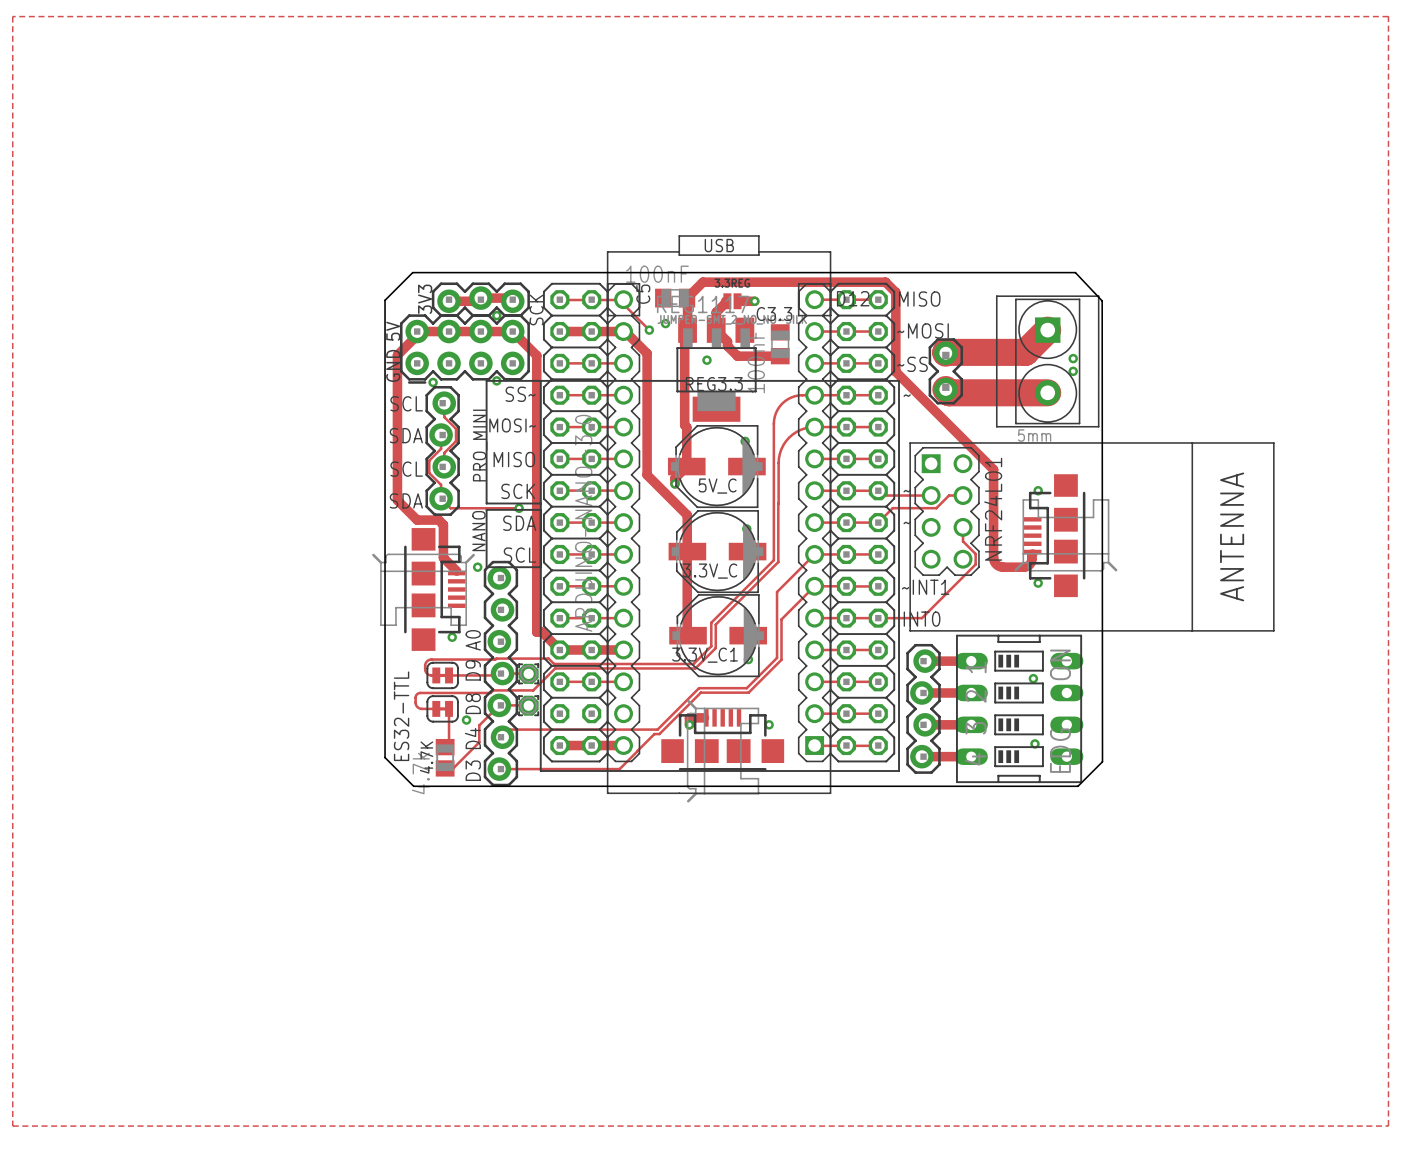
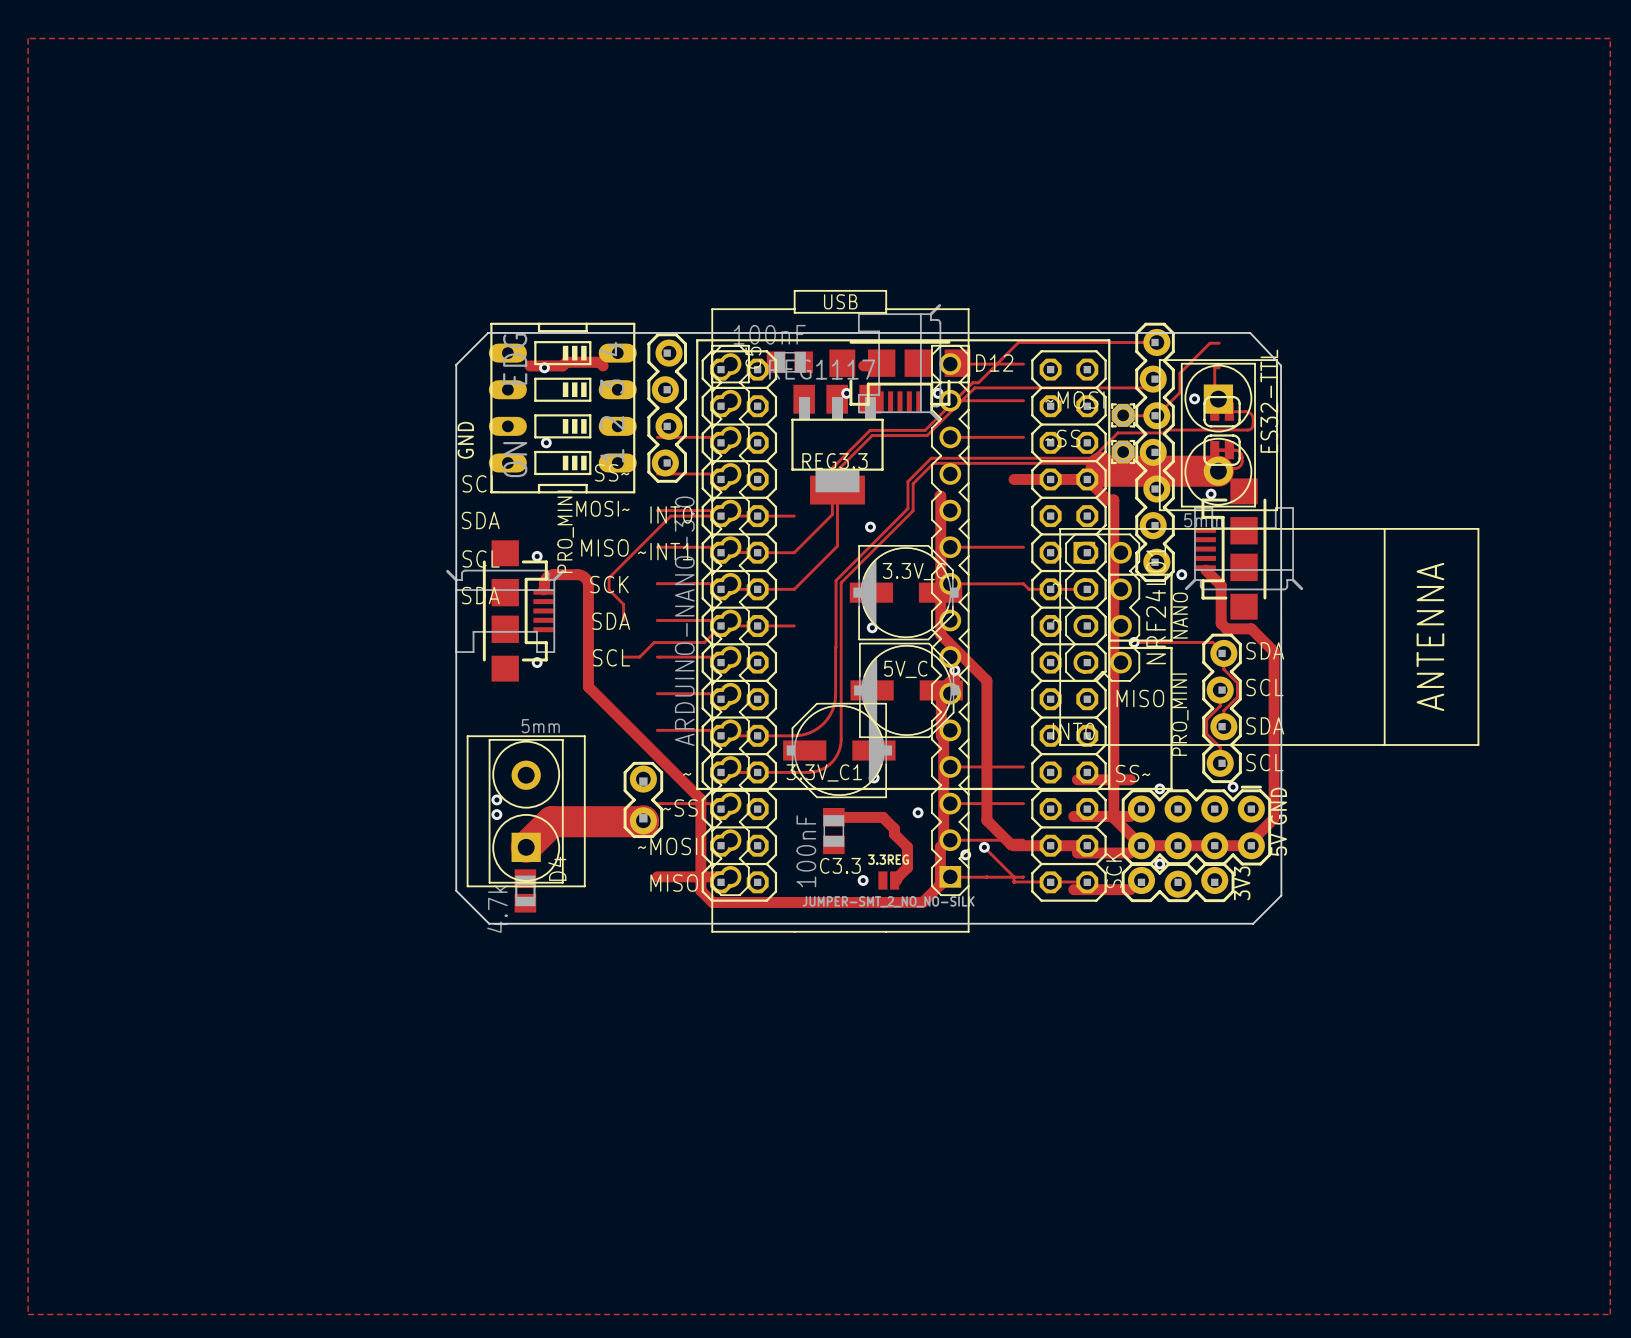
track: none -> (1156, 342) (1018, 342) (998, 362)
track: none -> (1219, 343) (1209, 343) (1179, 373) (1179, 392) (1156, 415) (1123, 415)
part: none -> (899, 363)
track: none -> (998, 363) (978, 382) (972, 382) (925, 430) (870, 430) (832, 468) (832, 514) (794, 552) (721, 552)
3V3 rotation: 0° (480, 299) -> 180° (1178, 882)
3V3 position: (480, 299) -> (1178, 882)
track: (559, 299) (623, 299) (623, 304) (649, 330) -> none
text: MISO (919, 299) -> none
track: (725, 301) (716, 312) (716, 330) (727, 341) (727, 346) (737, 356) (780, 356) -> none
3.3REG position: (732, 301) -> (888, 880)
via: (754, 301) -> none
via: none -> (544, 367)
track: none -> (1219, 367) (1214, 367) (1214, 411)
text: SCK (536, 309) -> none
track: none -> (1153, 379) (1144, 387) (974, 387) (927, 435) (872, 435) (837, 470) (837, 546) (794, 589) (721, 589)
C3.3 name position: C3.3 (774, 314) -> C3.3 (840, 865)
via: (496, 315) -> none
via: (665, 323) -> none
via: none -> (846, 393)
via: none -> (938, 393)
via: none -> (1194, 398)
via: (649, 330) -> none
track: (1047, 330) (1025, 352) (945, 353) -> none
text: 5V (393, 331) -> none
track: (559, 331) (623, 331) (647, 353) (647, 474) (687, 515) (688, 635) -> none
part: none -> (562, 408)
part: none -> (1222, 411)
track: none -> (1229, 411) (1250, 413) (1253, 418) (1252, 427) (1247, 430) (1166, 430) (1164, 432) (1117, 432) (1092, 458) (931, 458) (907, 481) (907, 508) (836, 580) (835, 694) (834, 705) (827, 719) (814, 730) (799, 735) (721, 735)
C3.3 position: (780, 344) -> (833, 831)
part: none -> (1123, 415)
part: (464, 349) -> none
via: (1073, 358) -> none
via: (706, 360) -> none
via: none -> (546, 442)
part: (945, 371) -> none
via: (1073, 371) -> none
part: none -> (1222, 450)
track: none -> (1229, 450) (1236, 450) (1241, 453) (1242, 462) (1238, 467) (1100, 469) (1093, 463) (933, 463) (913, 483) (913, 510) (841, 582) (841, 739) (840, 748) (834, 759) (824, 768) (812, 772) (721, 772)
part: none -> (1123, 452)
via: (496, 380) -> none
line: (540, 380) (540, 770) (899, 770) (899, 380) (486, 380) (486, 503) (540, 503) -> none
via: (433, 382) -> none
track: (878, 395) (798, 395) (788, 399) (779, 406) (773, 423) (773, 560) (711, 622) (711, 646) (693, 663) (554, 663) (548, 658) (428, 660) (425, 665) (426, 672) (429, 675) (436, 675) -> none
text: ~ (907, 395) -> none
track: none -> (1014, 479) (1087, 479) (1107, 499) (1113, 499) (1113, 818) (1141, 845) (1251, 845) (1251, 841) (1274, 818) (1274, 651) (1251, 628) (1226, 628) (1221, 623) (1221, 585) (1205, 570)
track: (444, 403) (444, 417) (456, 428) (456, 441) (444, 453) (444, 466) -> none
via: none -> (1211, 494)
track: none -> (939, 495) (940, 634) (986, 680) (986, 820) (1014, 845) (1087, 845)
track: (878, 427) (809, 427) (796, 431) (786, 441) (781, 449) (778, 463) (778, 562) (715, 624) (715, 648) (695, 668) (555, 668) (533, 690) (493, 690) (490, 692) (420, 692) (416, 694) (415, 703) (418, 707) (436, 708) -> none
text: none -> INT0 (671, 515)
track: none -> (794, 516) (670, 516) (609, 577) (609, 589) (623, 604) (623, 620)
track: (441, 435) (441, 448) (429, 460) (429, 473) (441, 484) (441, 498) (450, 508) (519, 508) -> none
part position: (442, 450) -> (667, 408)
text: none -> ~INT1 (665, 551)
via: none -> (537, 556)
5V_C rotation: 0° (716, 466) -> 180° (906, 690)
5V_C position: (716, 466) -> (906, 690)
line: none -> (1109, 574) (1171, 574) (1171, 640) (1109, 640)
track: (674, 483) (674, 478) (686, 466) (684, 333) (687, 330) (687, 298) (702, 282) (885, 282) (895, 292) (895, 371) (993, 469) (994, 562) (1001, 567) (1025, 566) (1030, 563) (1032, 553) -> none
via: (674, 483) -> none
via position: (1038, 490) -> (1181, 574)
track: (963, 495) (949, 495) (936, 508) (892, 508) (878, 522) (814, 522) -> none
track: none -> (543, 589) (545, 579) (551, 575) (578, 574) (586, 580) (588, 686) (700, 799) (700, 890) (712, 902) (922, 902) (941, 884) (940, 847) (943, 843) (943, 738) (941, 735) (941, 690) (954, 676) (954, 670)
via: (519, 508) -> none
line: (540, 509) (486, 509) (486, 567) (540, 567) -> none
text: none -> NANO (1180, 615)
part position: (575, 522) -> (739, 625)
part position: (862, 522) -> (1068, 625)
track: none -> (794, 625) (721, 625) (704, 642) (654, 642) (639, 657) (623, 657)
track: (963, 527) (963, 541) (975, 553) (975, 564) (921, 618) (814, 618) -> none
text: NANO (478, 531) -> none
part position: (1065, 535) -> (1244, 549)
track: none -> (1134, 642) (1212, 642) (1223, 653) (1223, 669) (1237, 682) (1237, 697) (1223, 710) (1223, 726)
via: none -> (1134, 642)
line: none -> (1109, 647) (1171, 647) (1171, 788) (697, 788) (697, 340) (1109, 340) (1109, 788)
text: none -> SDA (1265, 650)
3.3V_C rotation: 0° (717, 551) -> 180° (905, 592)
3.3V_C position: (717, 551) -> (905, 592)
track: (878, 554) (814, 554) (777, 592) (777, 657) (746, 688) (699, 688) (657, 729) (510, 729) (502, 737) -> none
via: none -> (954, 670)
via position: (477, 567) -> (537, 662)
track: (456, 571) (443, 557) (443, 524) (438, 520) (417, 520) (397, 500) (397, 355) (417, 335) (417, 331) (512, 331) (536, 355) (536, 632) (542, 632) (559, 649) (623, 649) -> none
text: none -> SCL (1264, 687)
via: (1038, 583) -> none
track: none -> (1220, 690) (1220, 706) (1206, 719) (1206, 733) (1220, 747) (1220, 763)
track: (878, 586) (814, 586) (781, 619) (781, 659) (748, 692) (700, 692) (659, 734) (654, 734) (637, 751) -> none
text: ~INT1 (925, 587) -> none
part position: (423, 589) -> (505, 610)
text: none -> MISO (1140, 698)
text: none -> PRO_MINI (1180, 714)
text: none -> SDA (1265, 725)
part footprint: [954, 634, 1084, 784] -> [1121, 785, 1272, 866]
via: (452, 637) -> none
text: A0 (473, 640) -> none
text: none -> SCL (1264, 762)
text: none -> SS~ (1133, 773)
text: none -> ~ (687, 774)
via: none -> (1233, 787)
via: none -> (1159, 788)
text: D9 (473, 670) -> none
ES32-TTL rotation: 0° (500, 673) -> 180° (1155, 452)
ES32-TTL position: (500, 673) -> (1155, 452)
track: (528, 673) (449, 675) -> none
part: (528, 673) -> none
part: (442, 675) -> none
via: none -> (496, 799)
part: none -> (643, 799)
via: (1033, 678) -> none
text: none -> GND (1278, 806)
text: none -> ~SS (680, 807)
part: none -> 5mm (526, 811)
via: none -> (918, 812)
via: none -> (496, 814)
track: none -> (833, 817) (882, 817) (894, 828) (894, 834) (907, 847) (907, 867) (896, 880)
track: none -> (643, 820) (551, 821) (526, 847)
text: D8 (473, 703) -> none
track: (528, 705) (499, 705) (479, 725) (479, 742) (453, 768) (445, 768) -> none
part: (528, 705) -> none
part: (442, 708) -> none
track: (449, 708) (449, 747) (445, 747) -> none
part position: (923, 708) -> (1222, 708)
track: (704, 717) (689, 717) (689, 724) -> none
text: none -> 5V (1278, 844)
text: none -> ~MOSI (667, 846)
track: none -> (984, 847) (1013, 876) (1014, 882) (1087, 882)
via: none -> (984, 847)
via: (466, 720) -> none
via: (689, 724) -> none
via: (769, 724) -> none
via: none -> (965, 854)
via: none -> (1159, 864)
text: none -> SCK (1114, 870)
via: (1034, 743) -> none
via: none -> (863, 880)
text: none -> MISO (674, 883)
track: (637, 751) (619, 769) (499, 769) -> none
part: (722, 751) -> none
text: 4.7K (426, 757) -> none
text: D3 (473, 770) -> none

